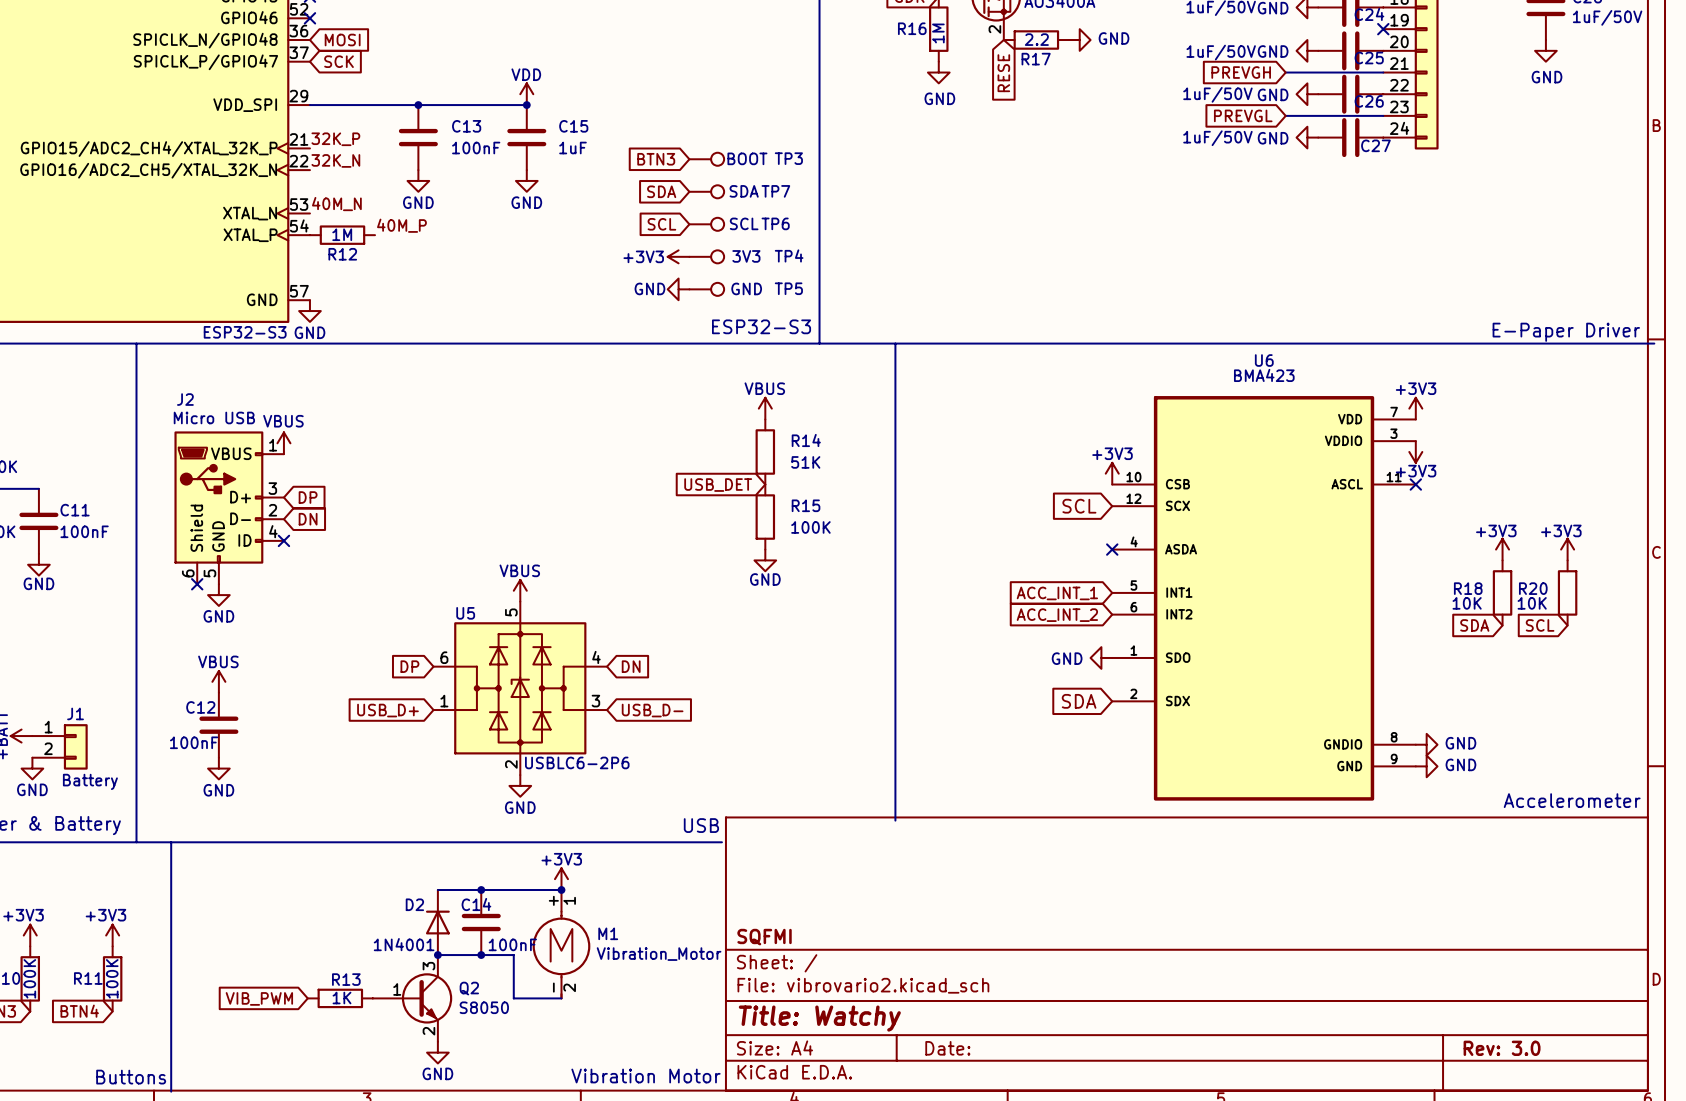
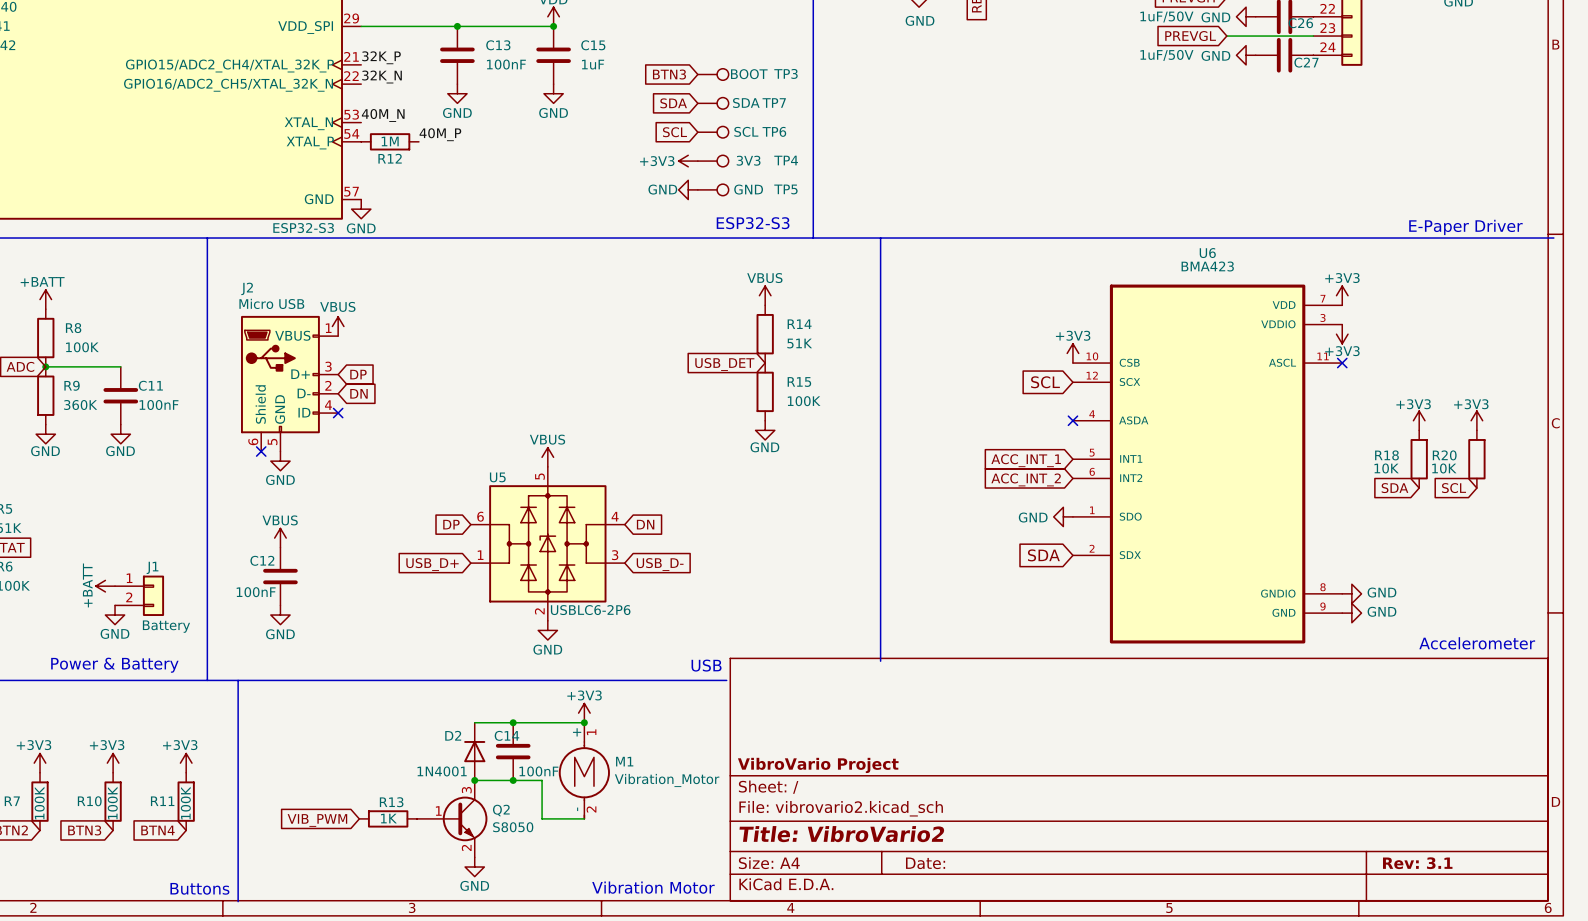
title block: SQFMI (764, 937) -> VibroVario Project (818, 765)
title block: Title: Watchy (819, 1018) -> Title: VibroVario2 (841, 834)
title block: Rev: 3.0 (1502, 1048) -> Rev: 3.1 (1417, 863)

